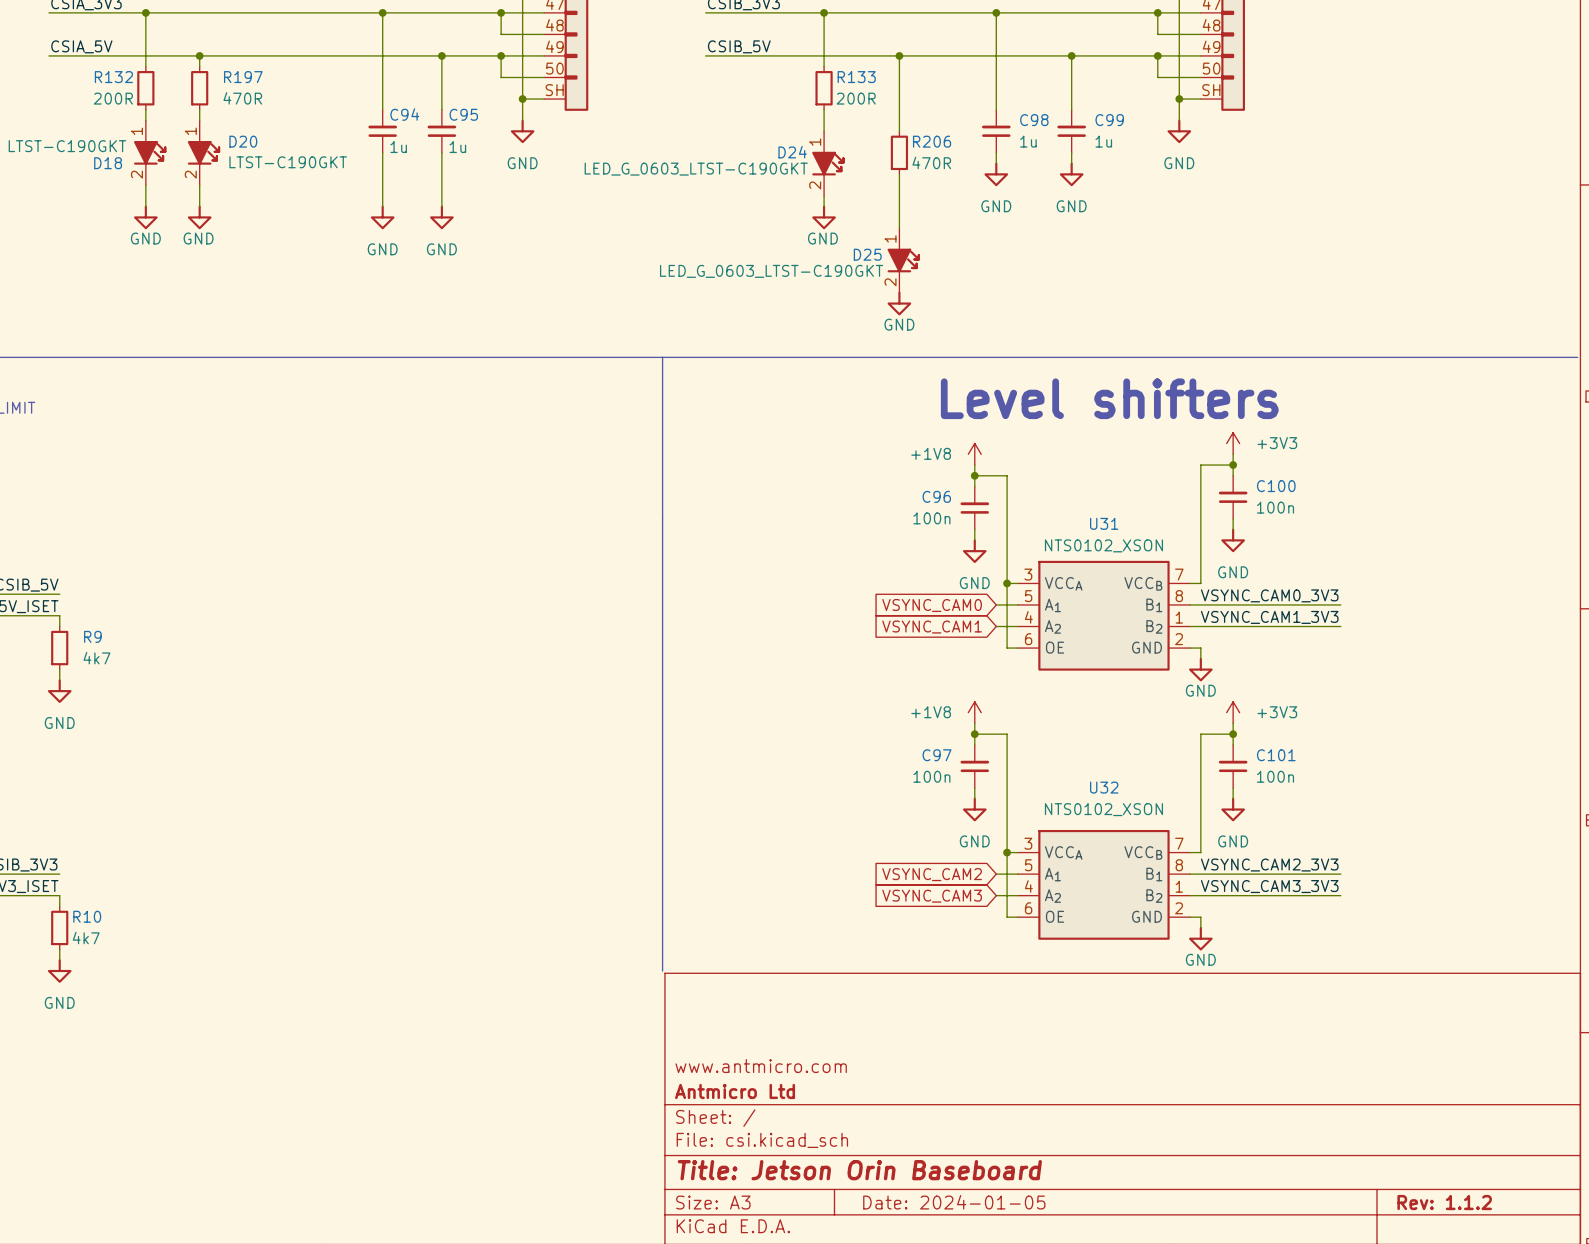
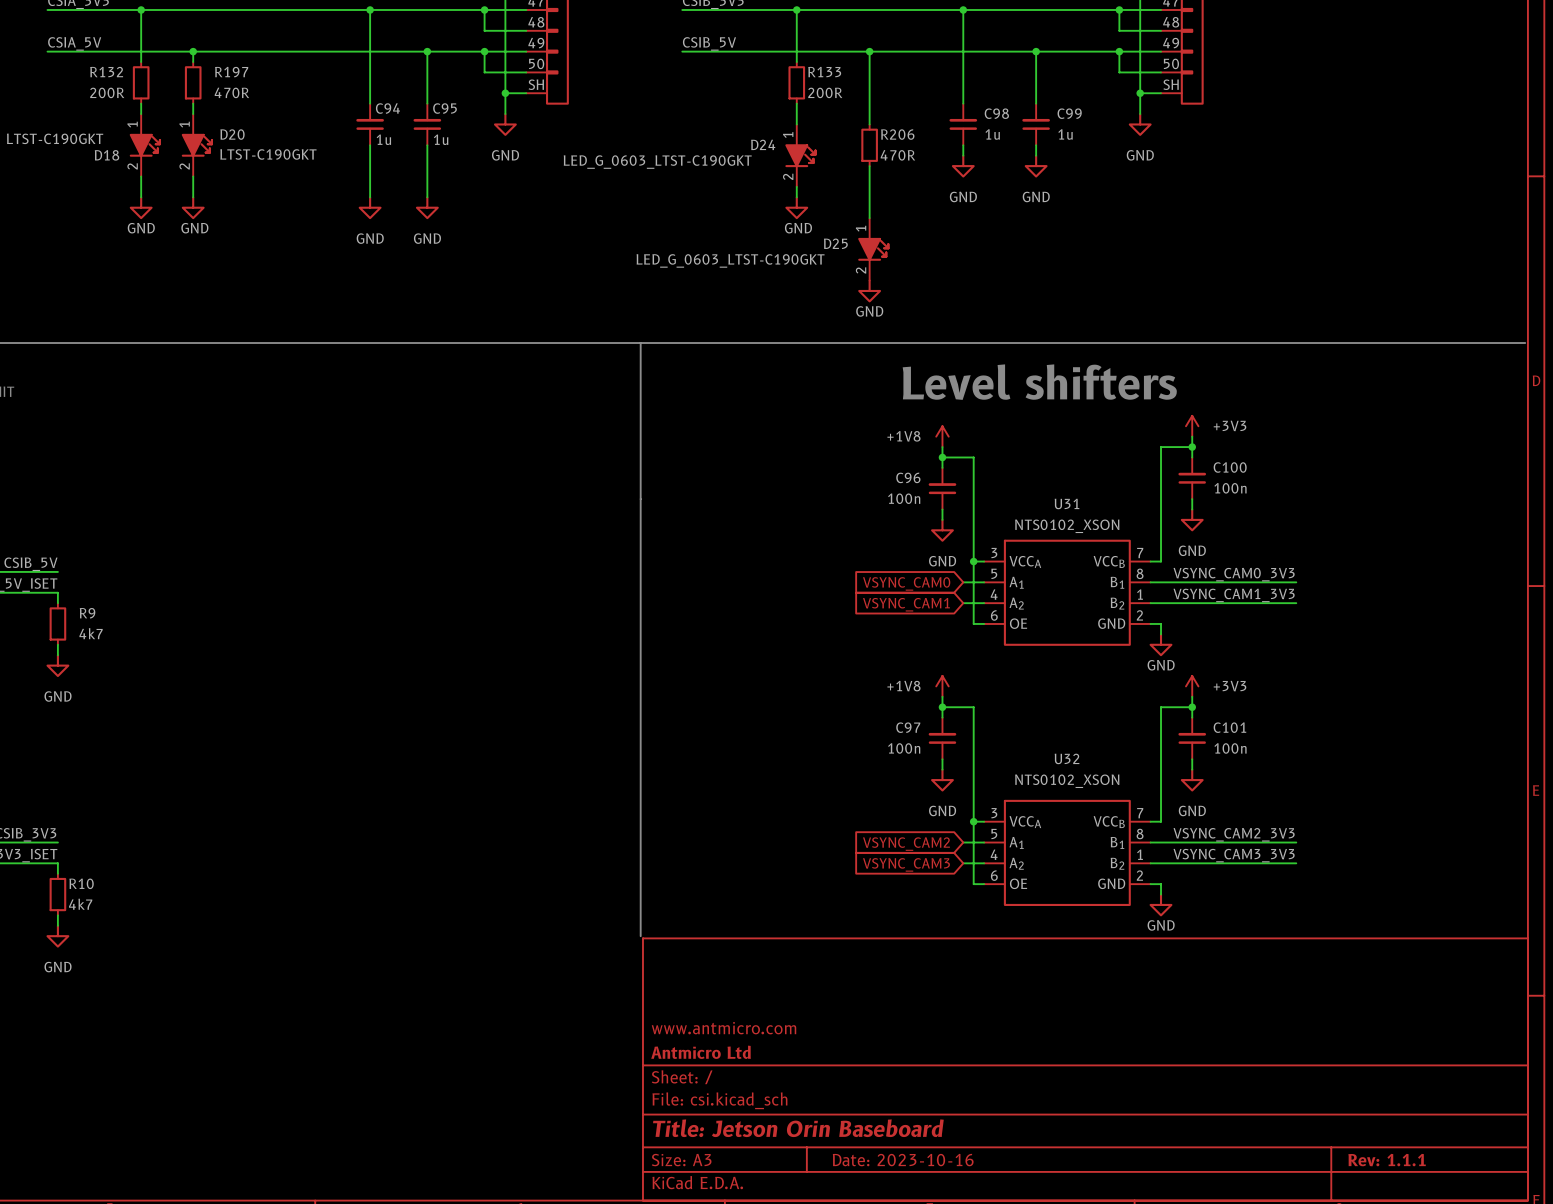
title block: Date: 2024-01-05 (954, 1202) -> Date: 2023-10-16 (903, 1160)
title block: Rev: 1.1.2 (1444, 1202) -> Rev: 1.1.1 (1387, 1160)

